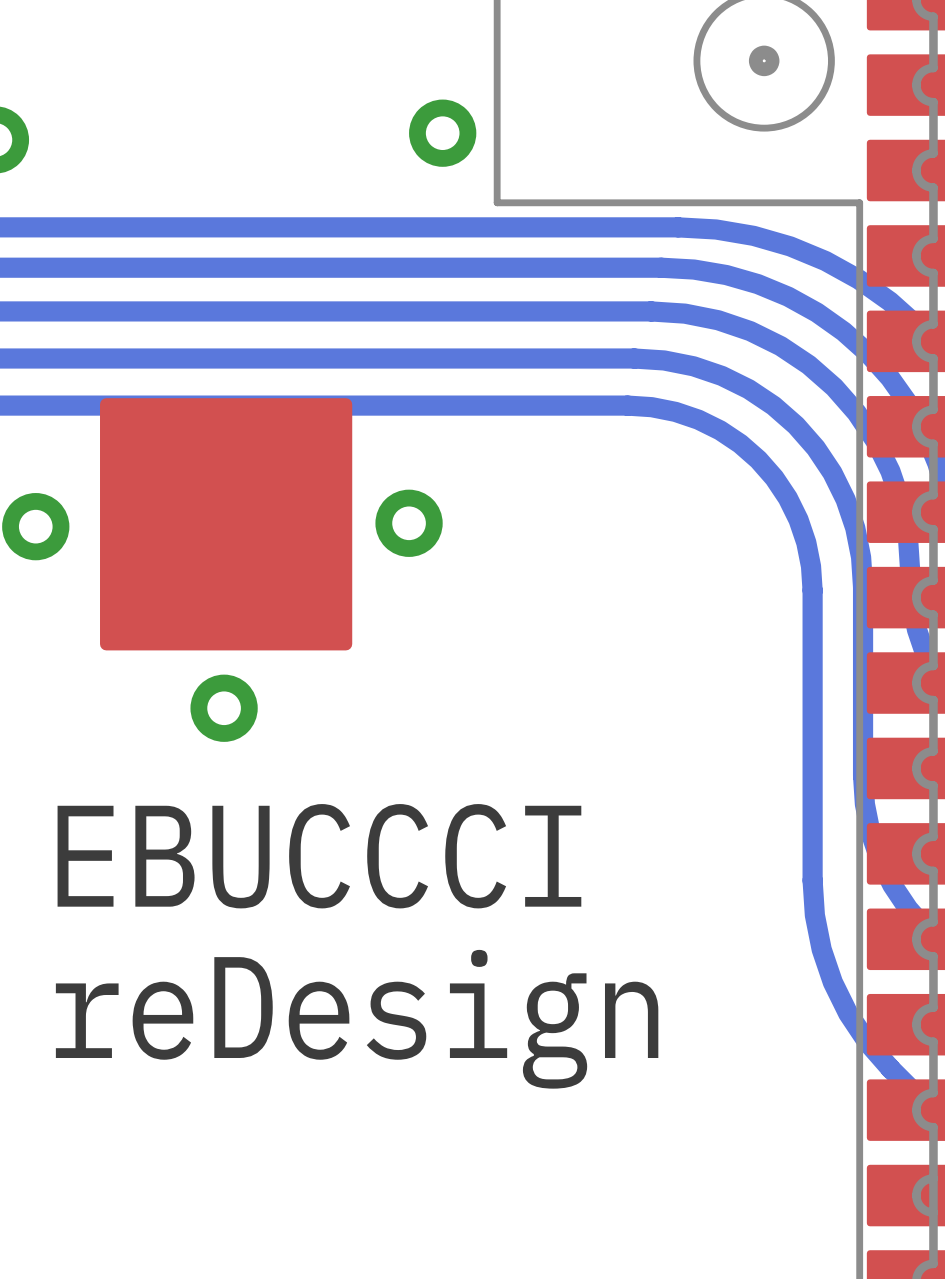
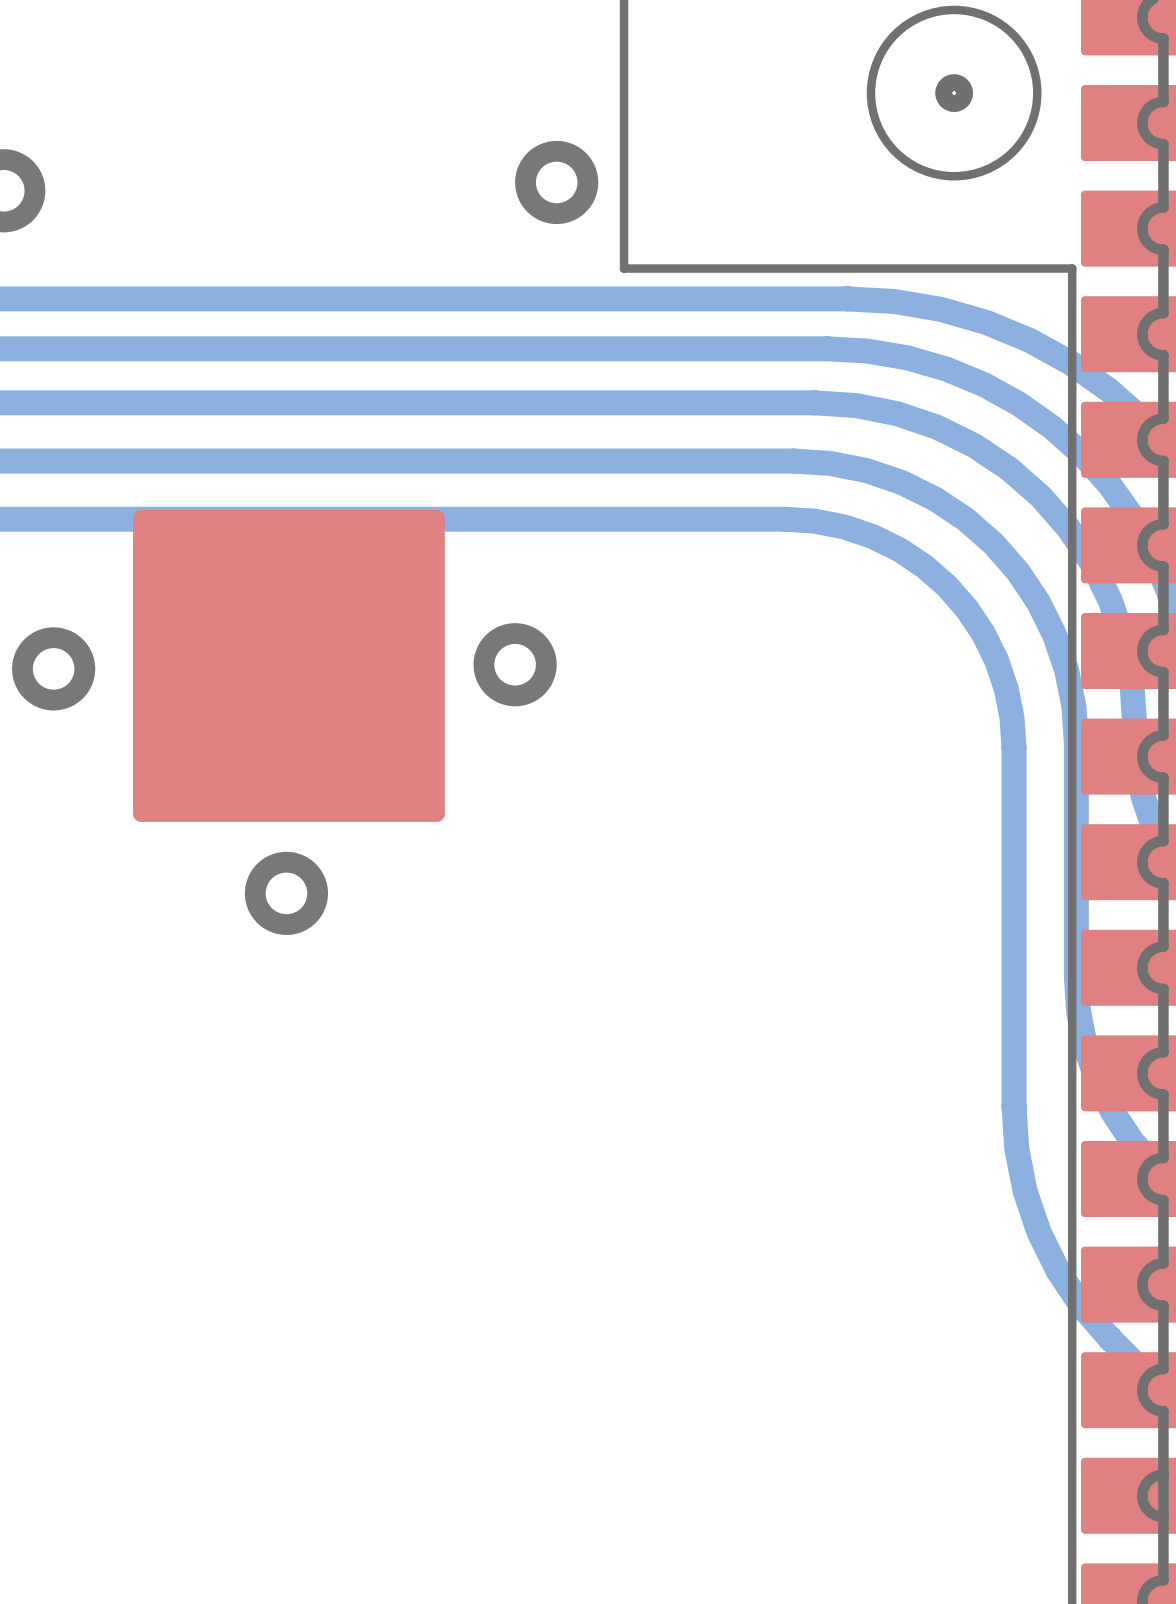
text: EBUCCCI (319, 856) -> none
text: reDesign (357, 1019) -> none

